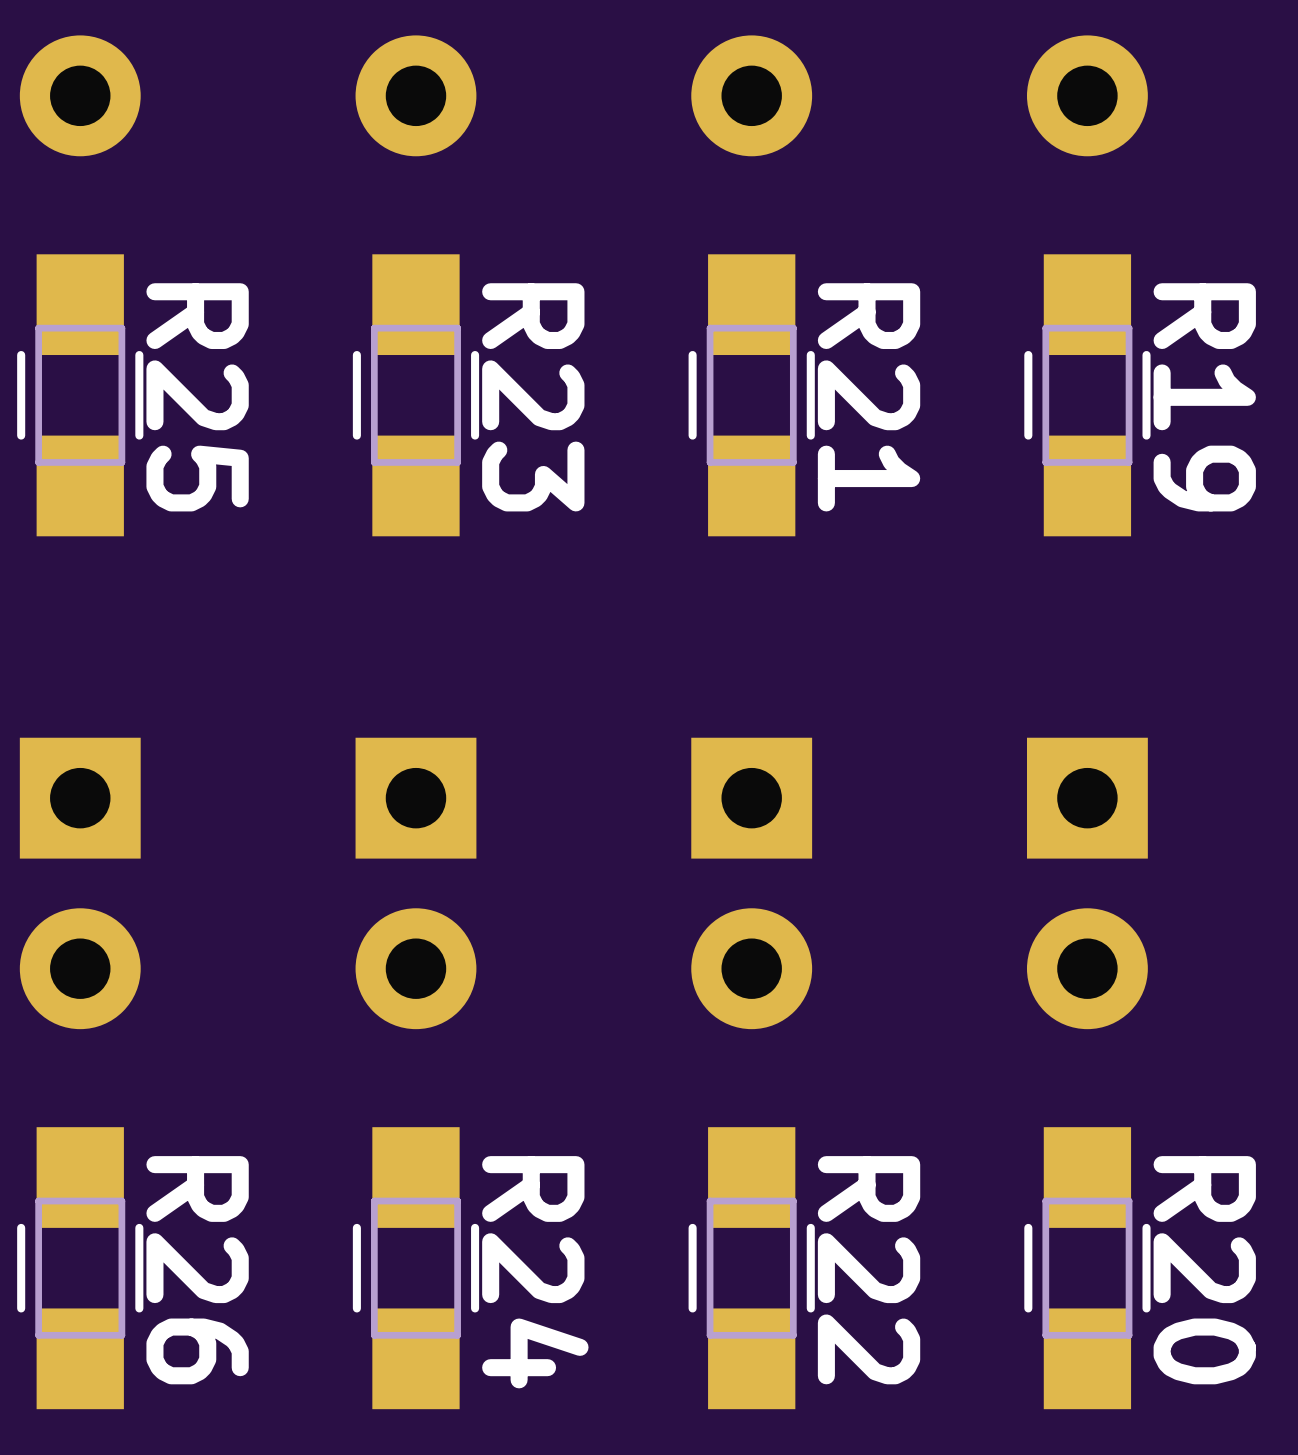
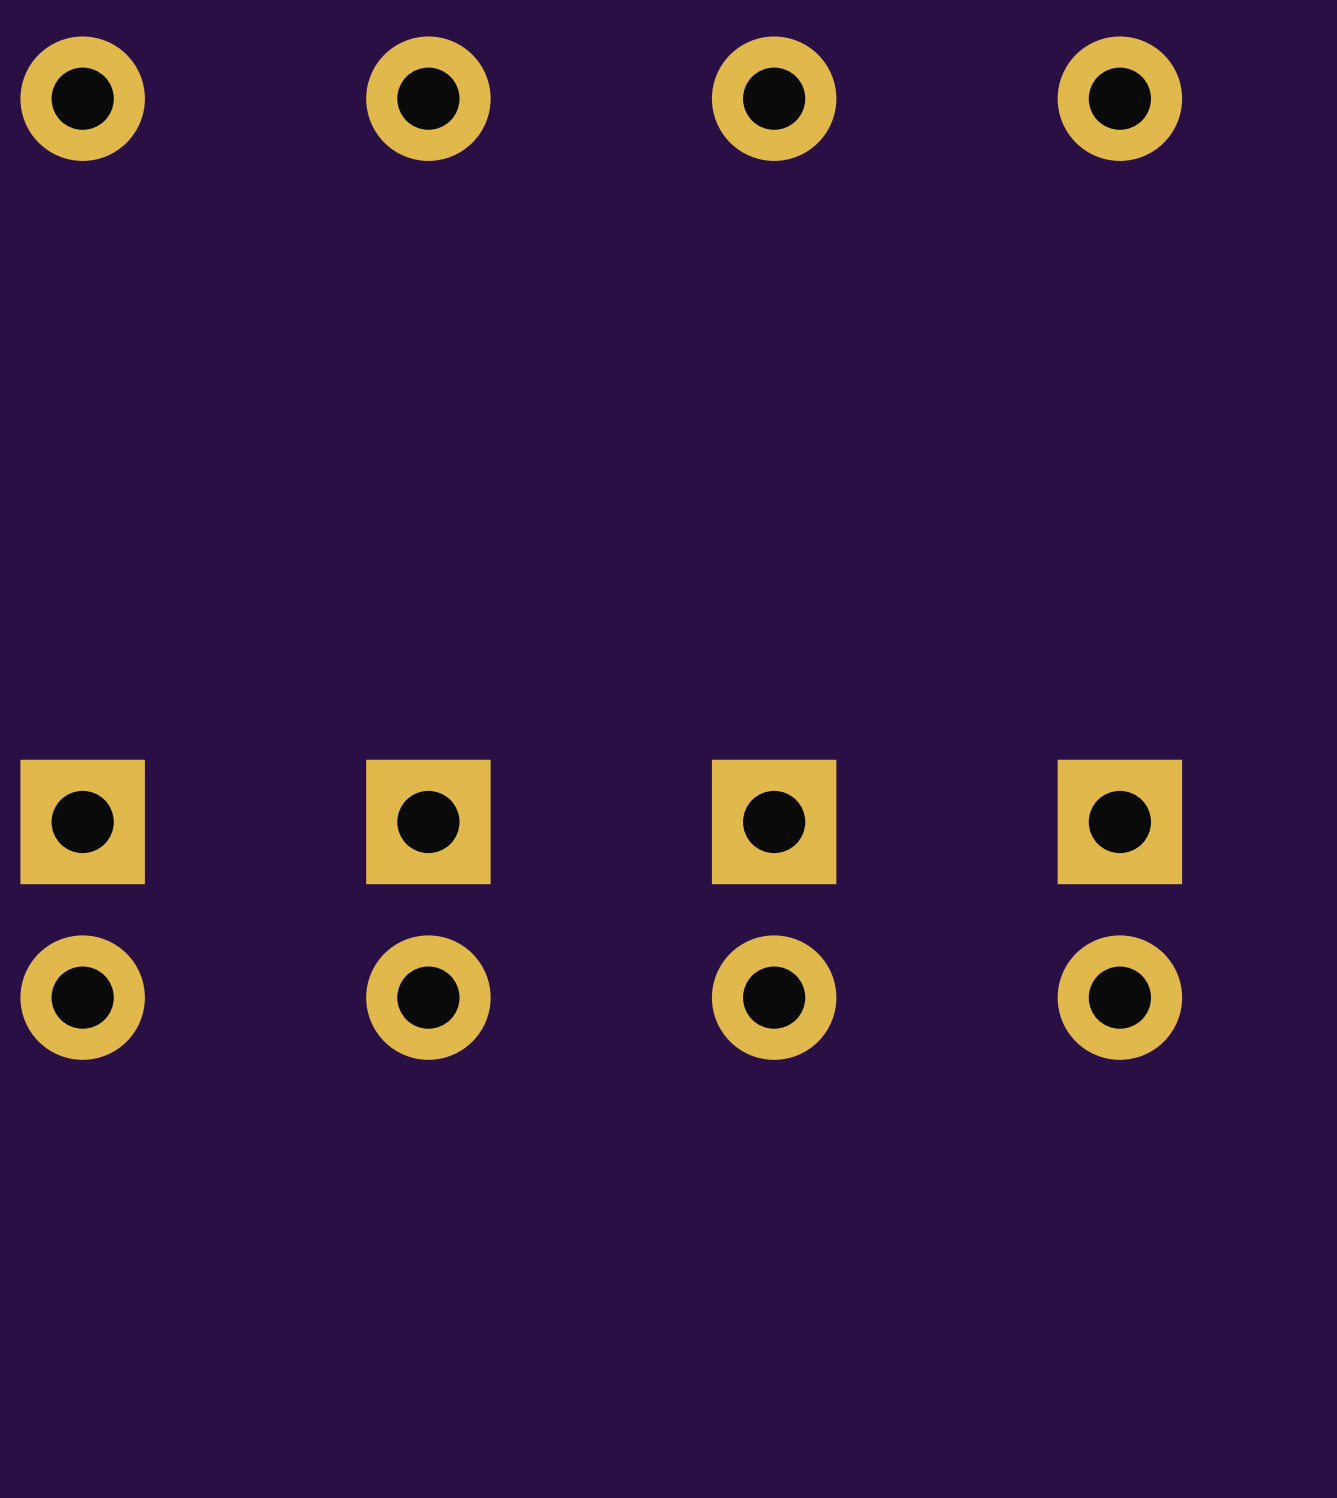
R25: (80, 395) -> none
R23: (415, 395) -> none
R21: (751, 395) -> none
R19: (1087, 395) -> none
R26: (80, 1268) -> none
R24: (415, 1268) -> none
R22: (751, 1268) -> none
R20: (1087, 1268) -> none

